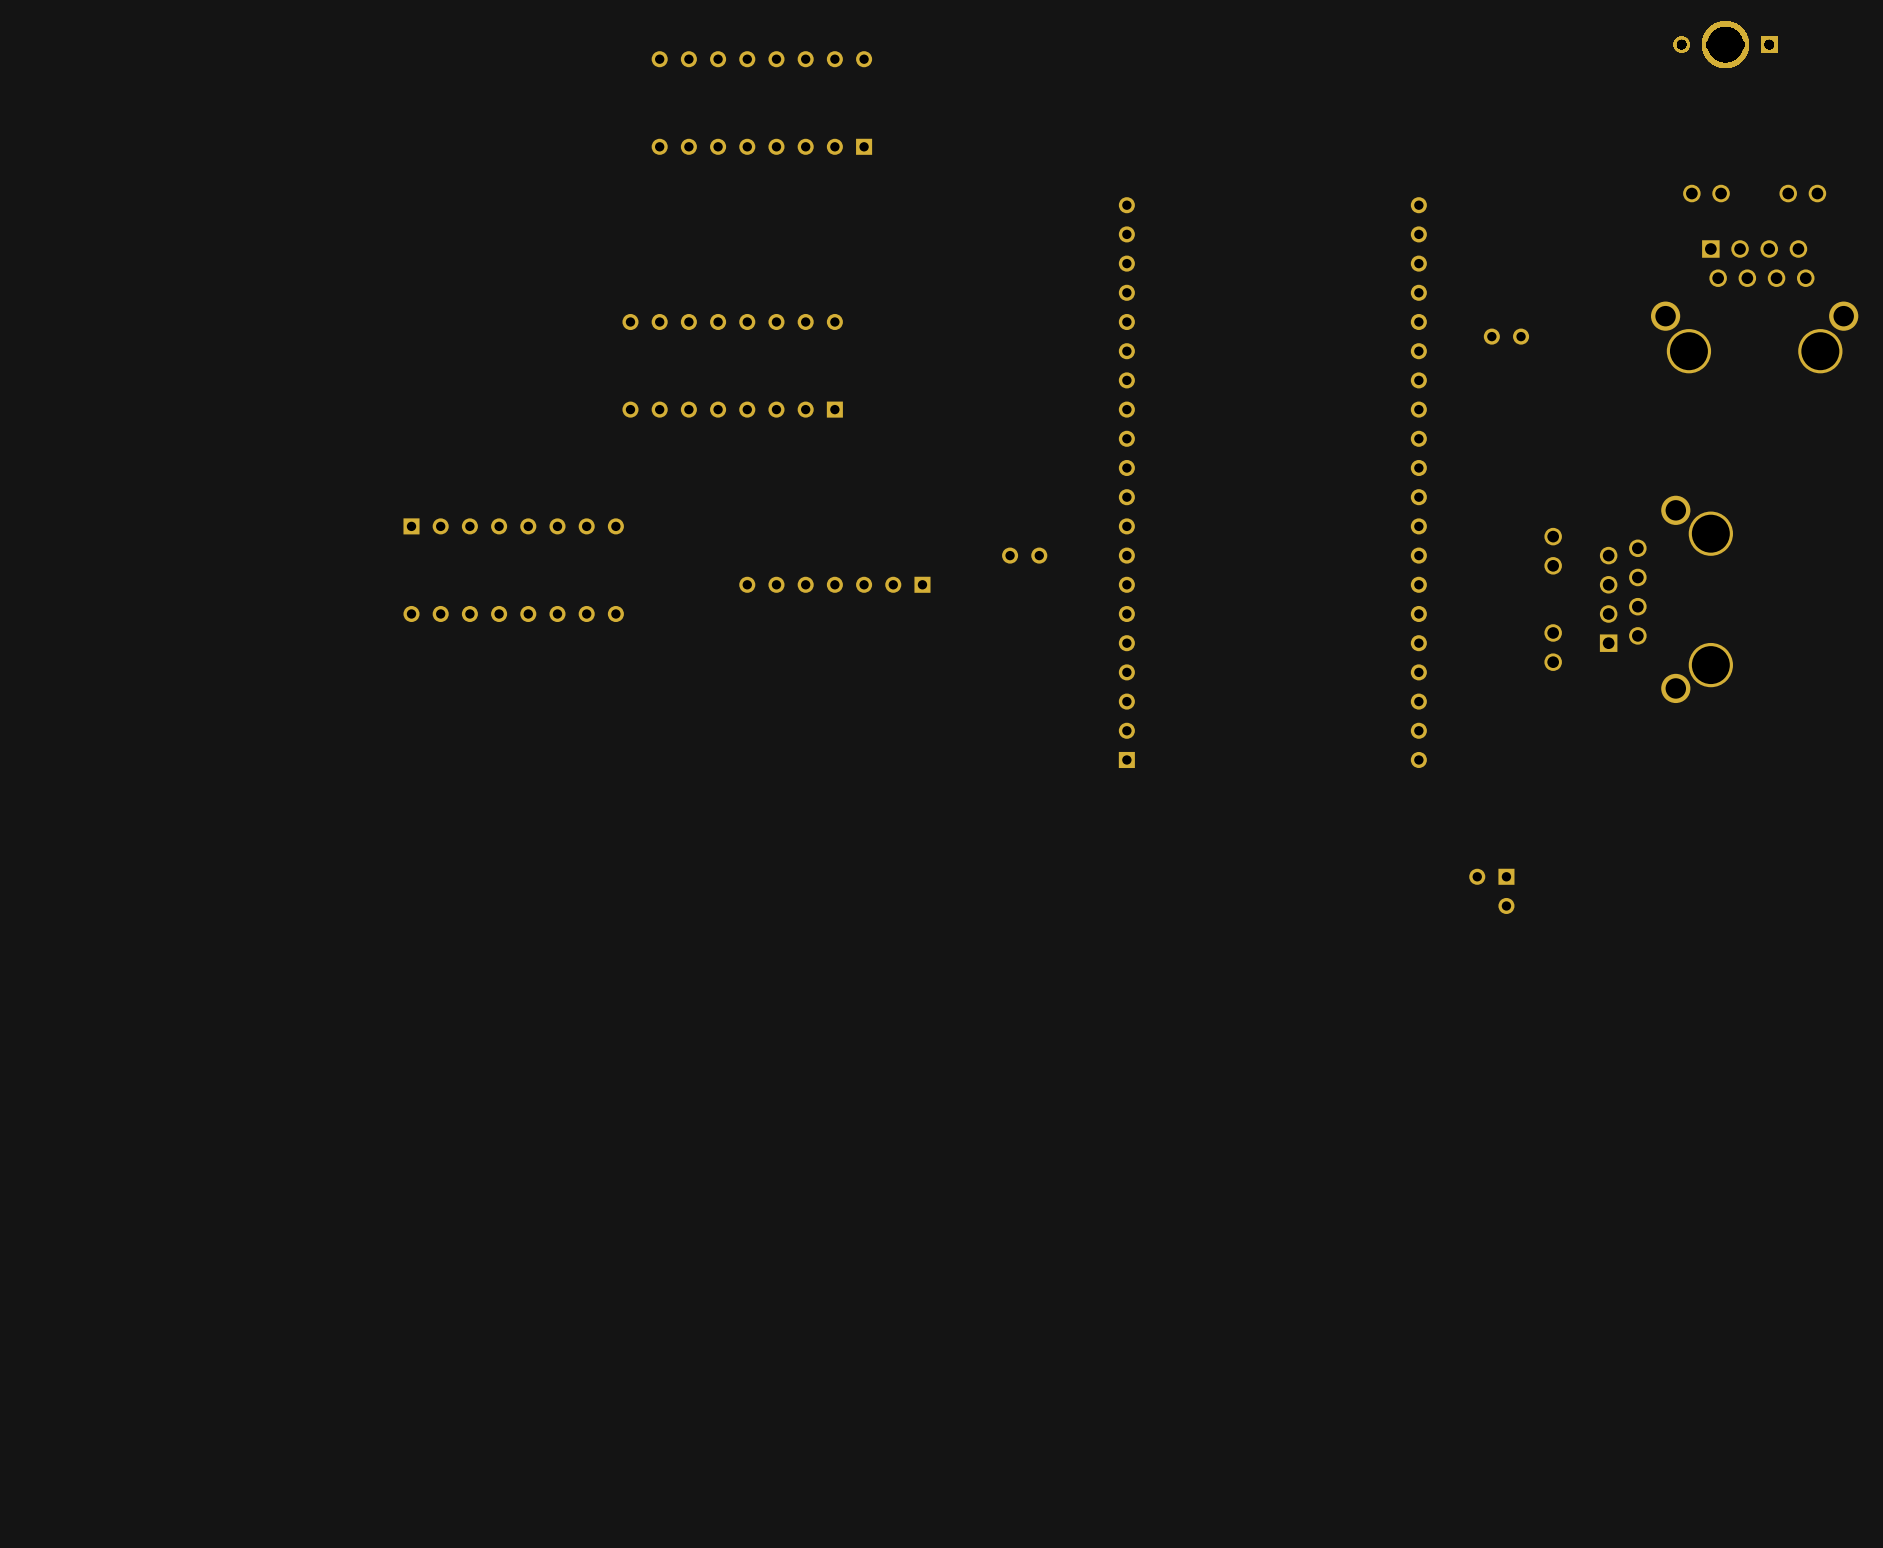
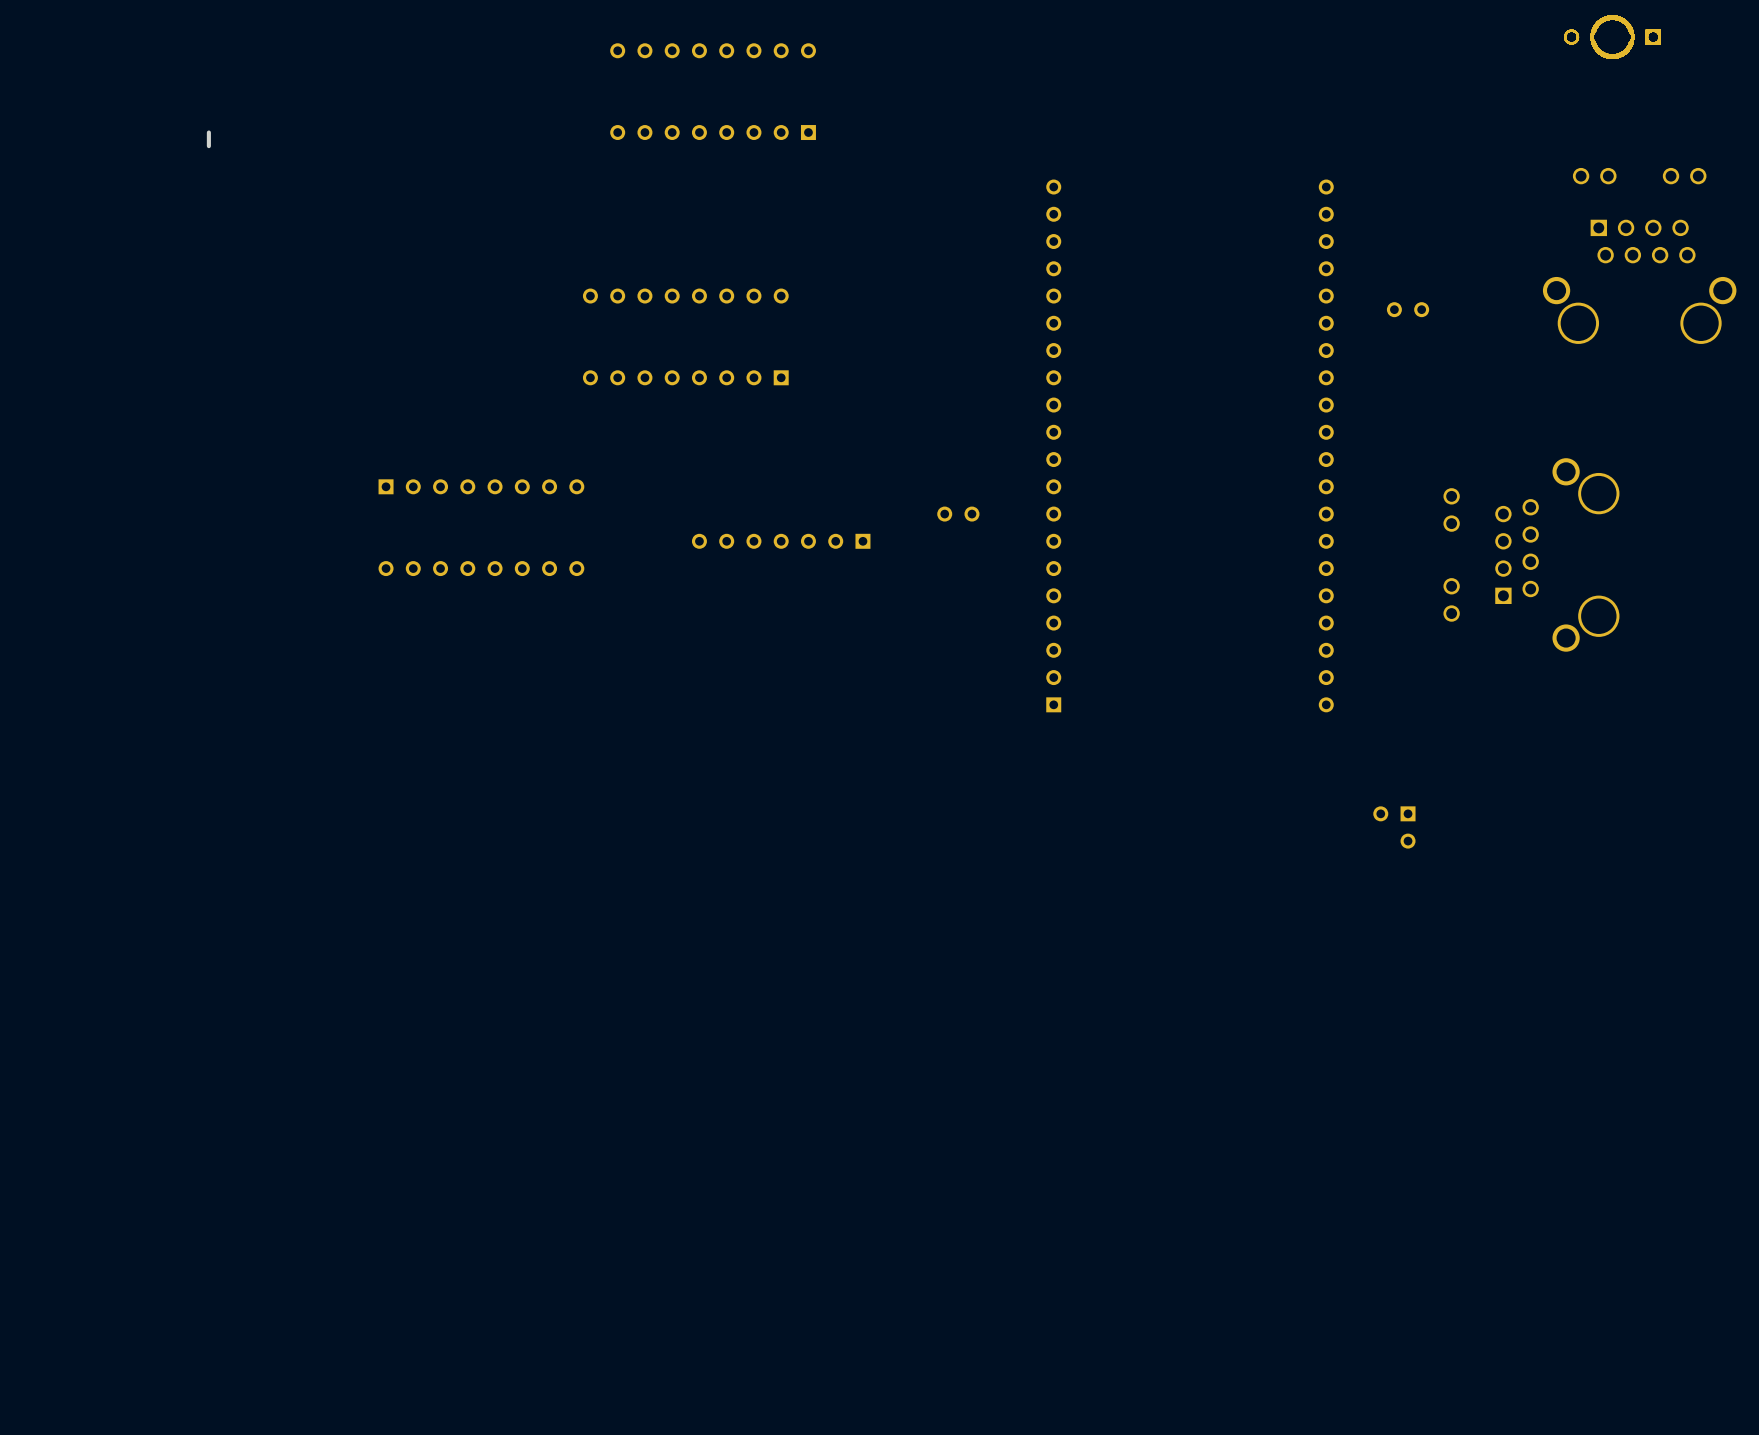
board edge: none -> (208, 132) (208, 146)

